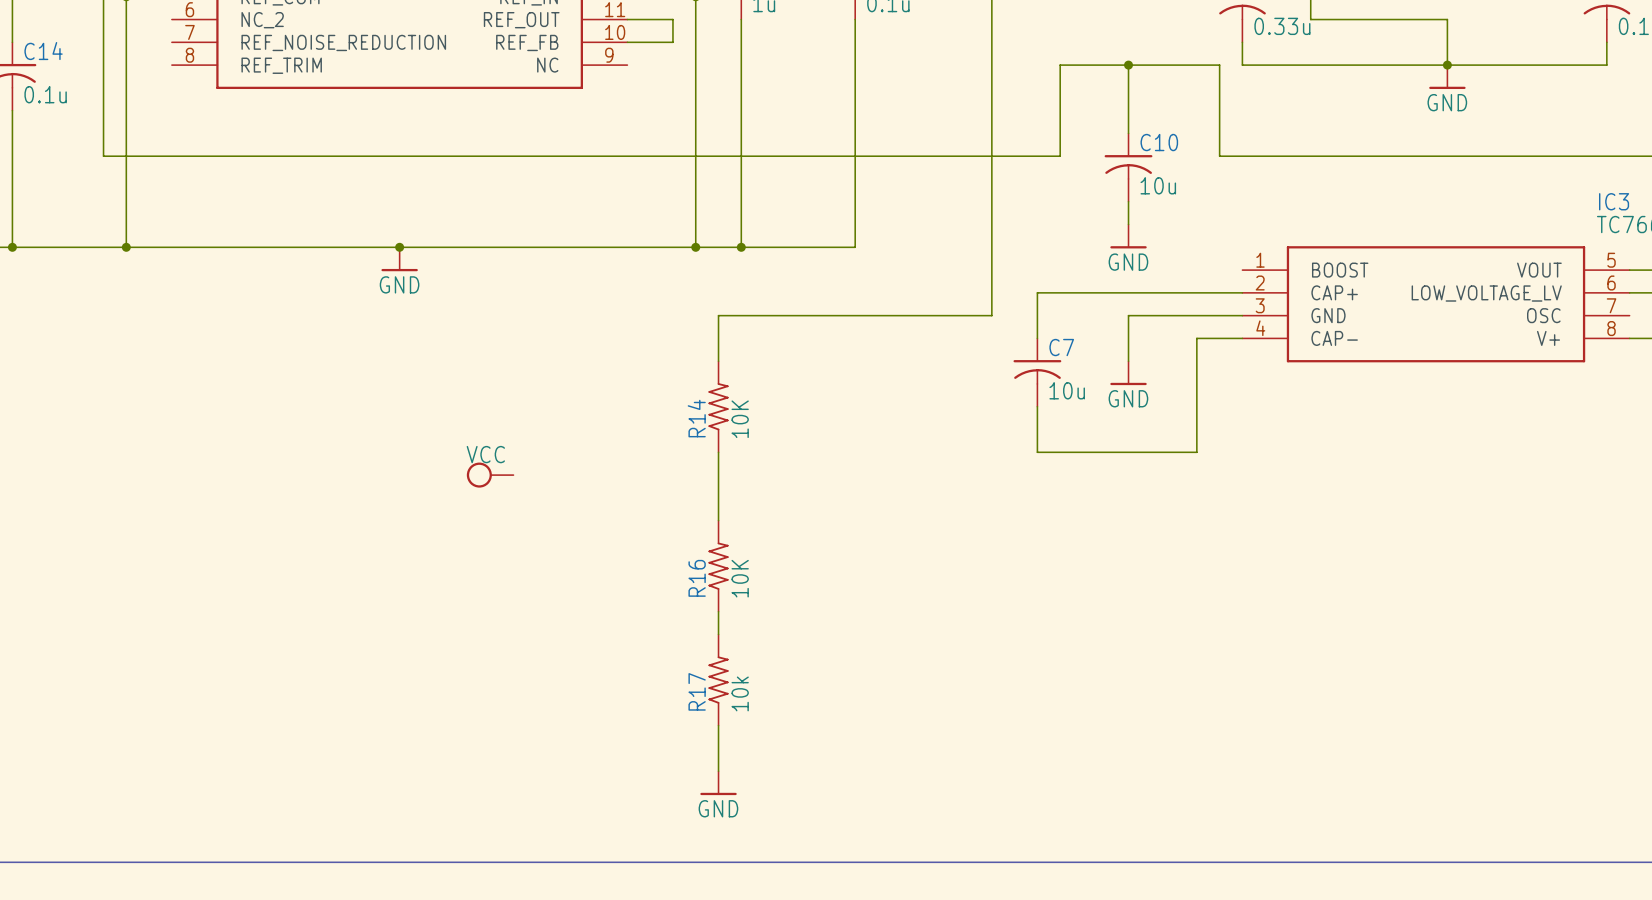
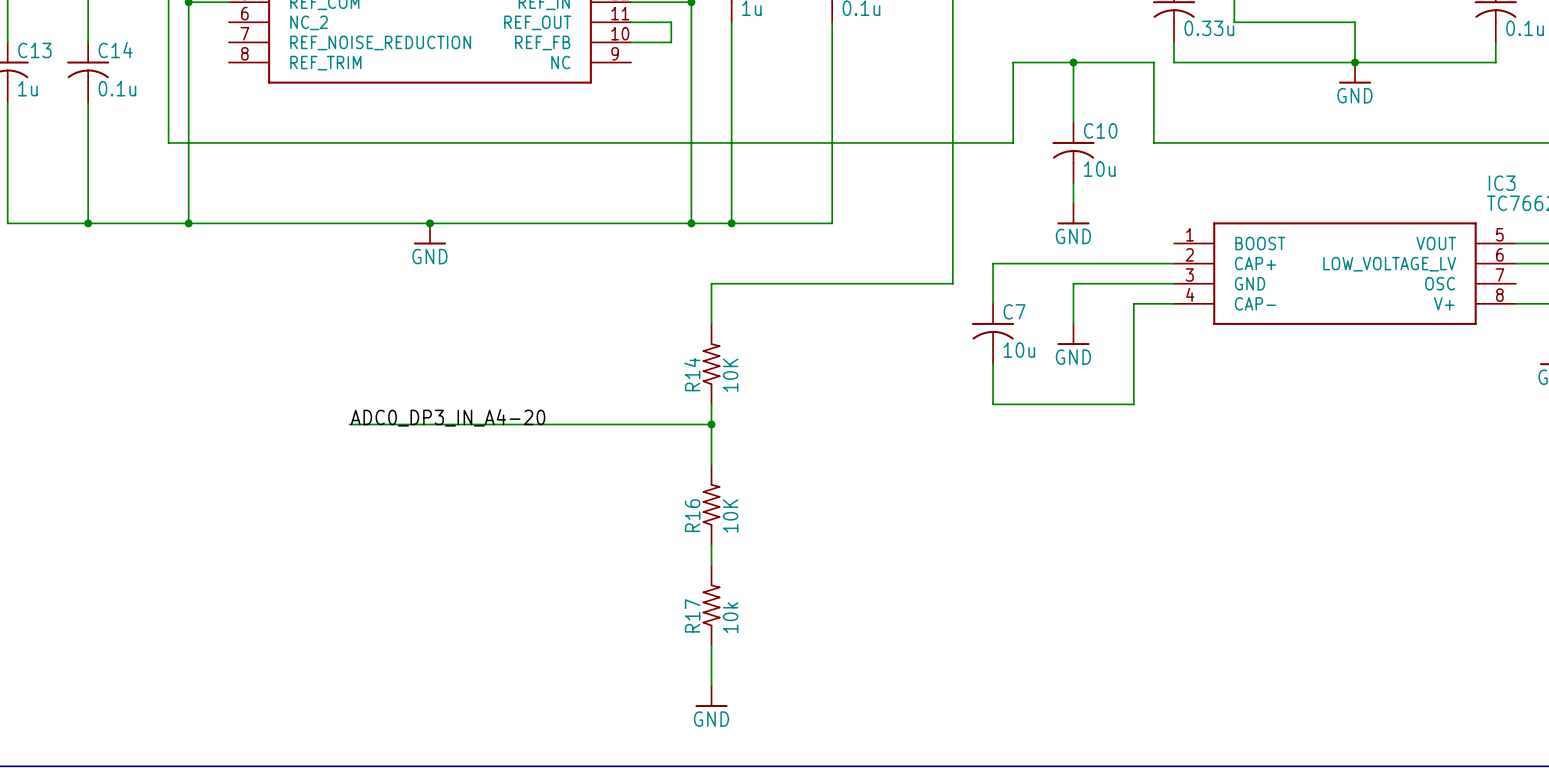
label: none -> ADC0_DP3_IN_A4-20 (448, 417)
wire: none -> (349, 424) (711, 424)
power symbol: VCC (490, 475) -> none
junction: none -> (711, 424)

